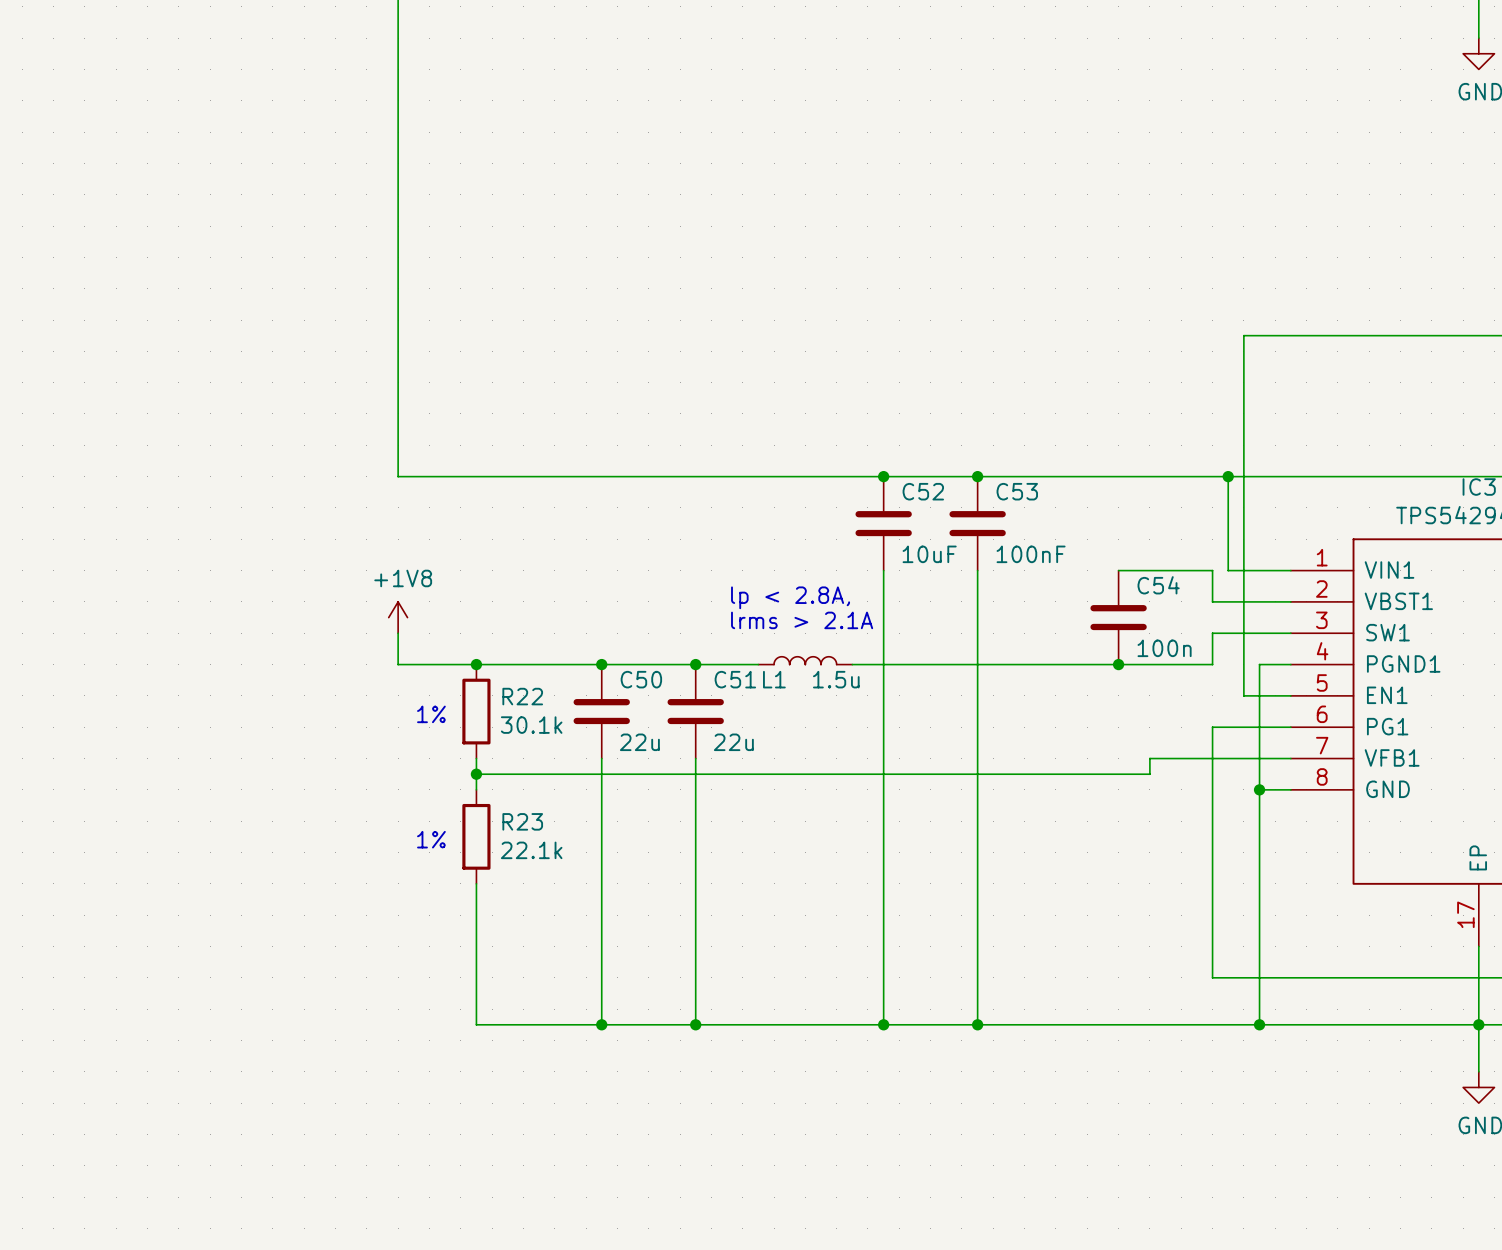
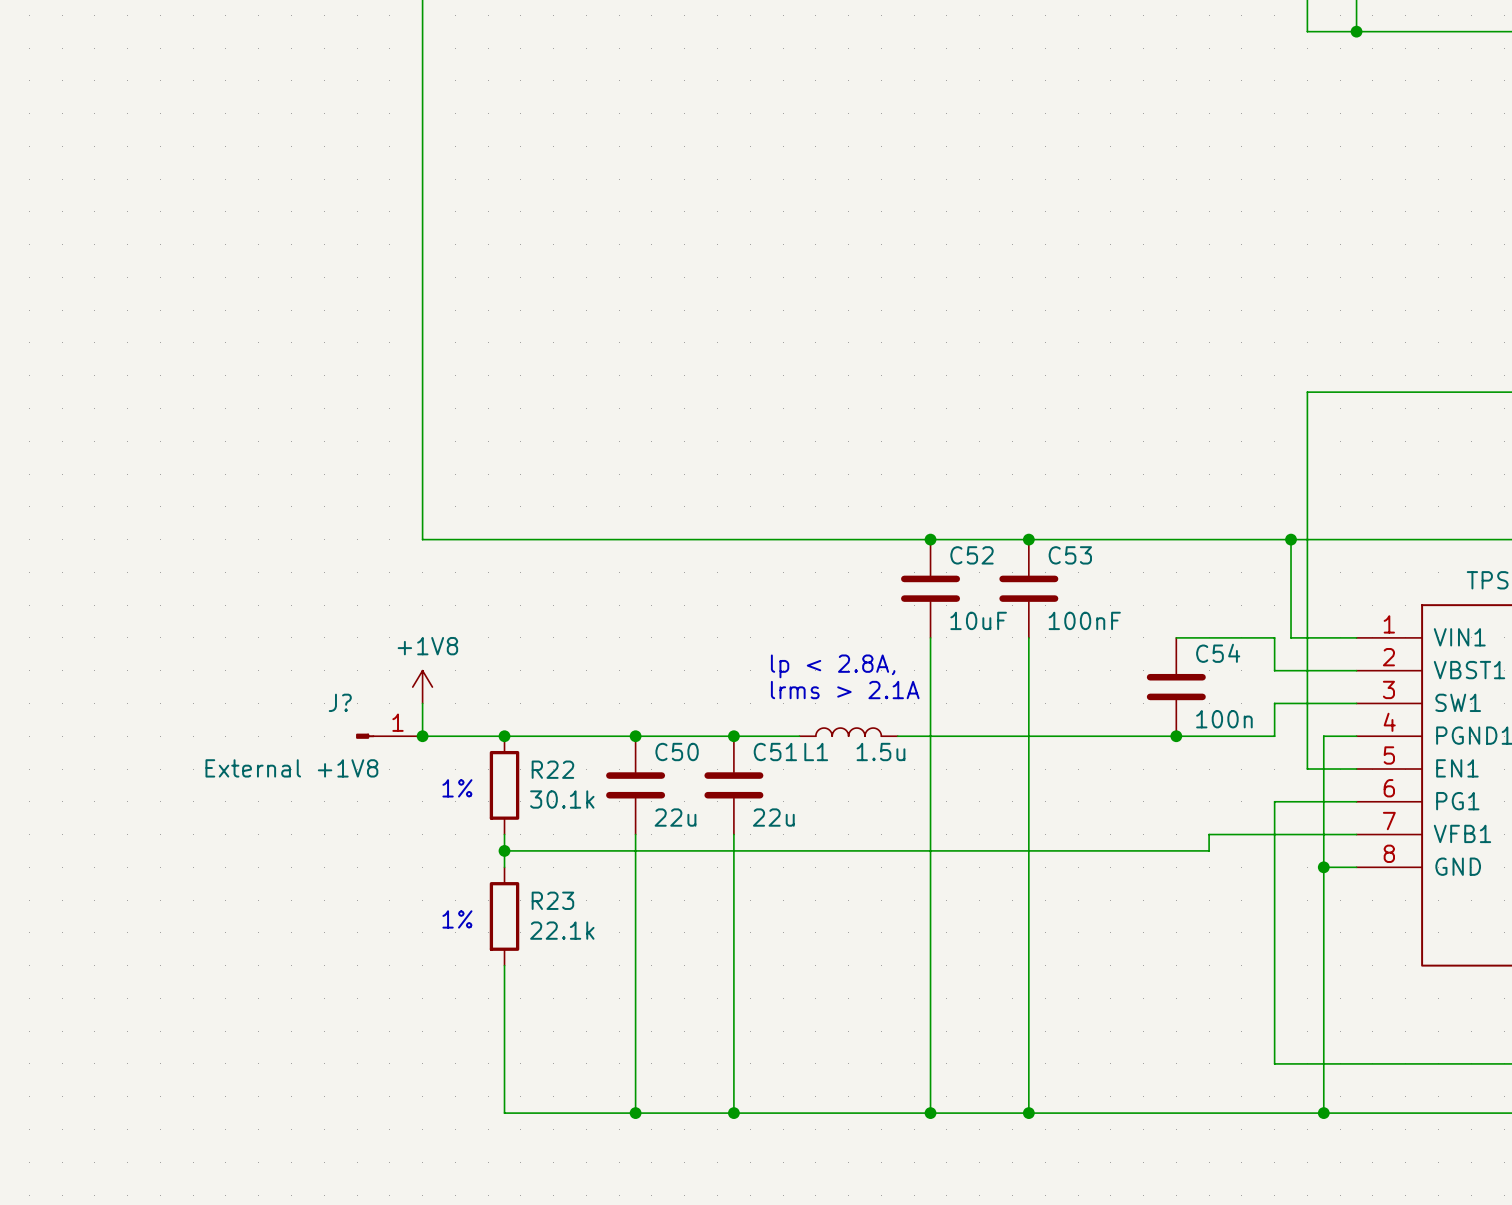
J?: none -> External +1V8 (389, 736)
junction: none -> (422, 736)

